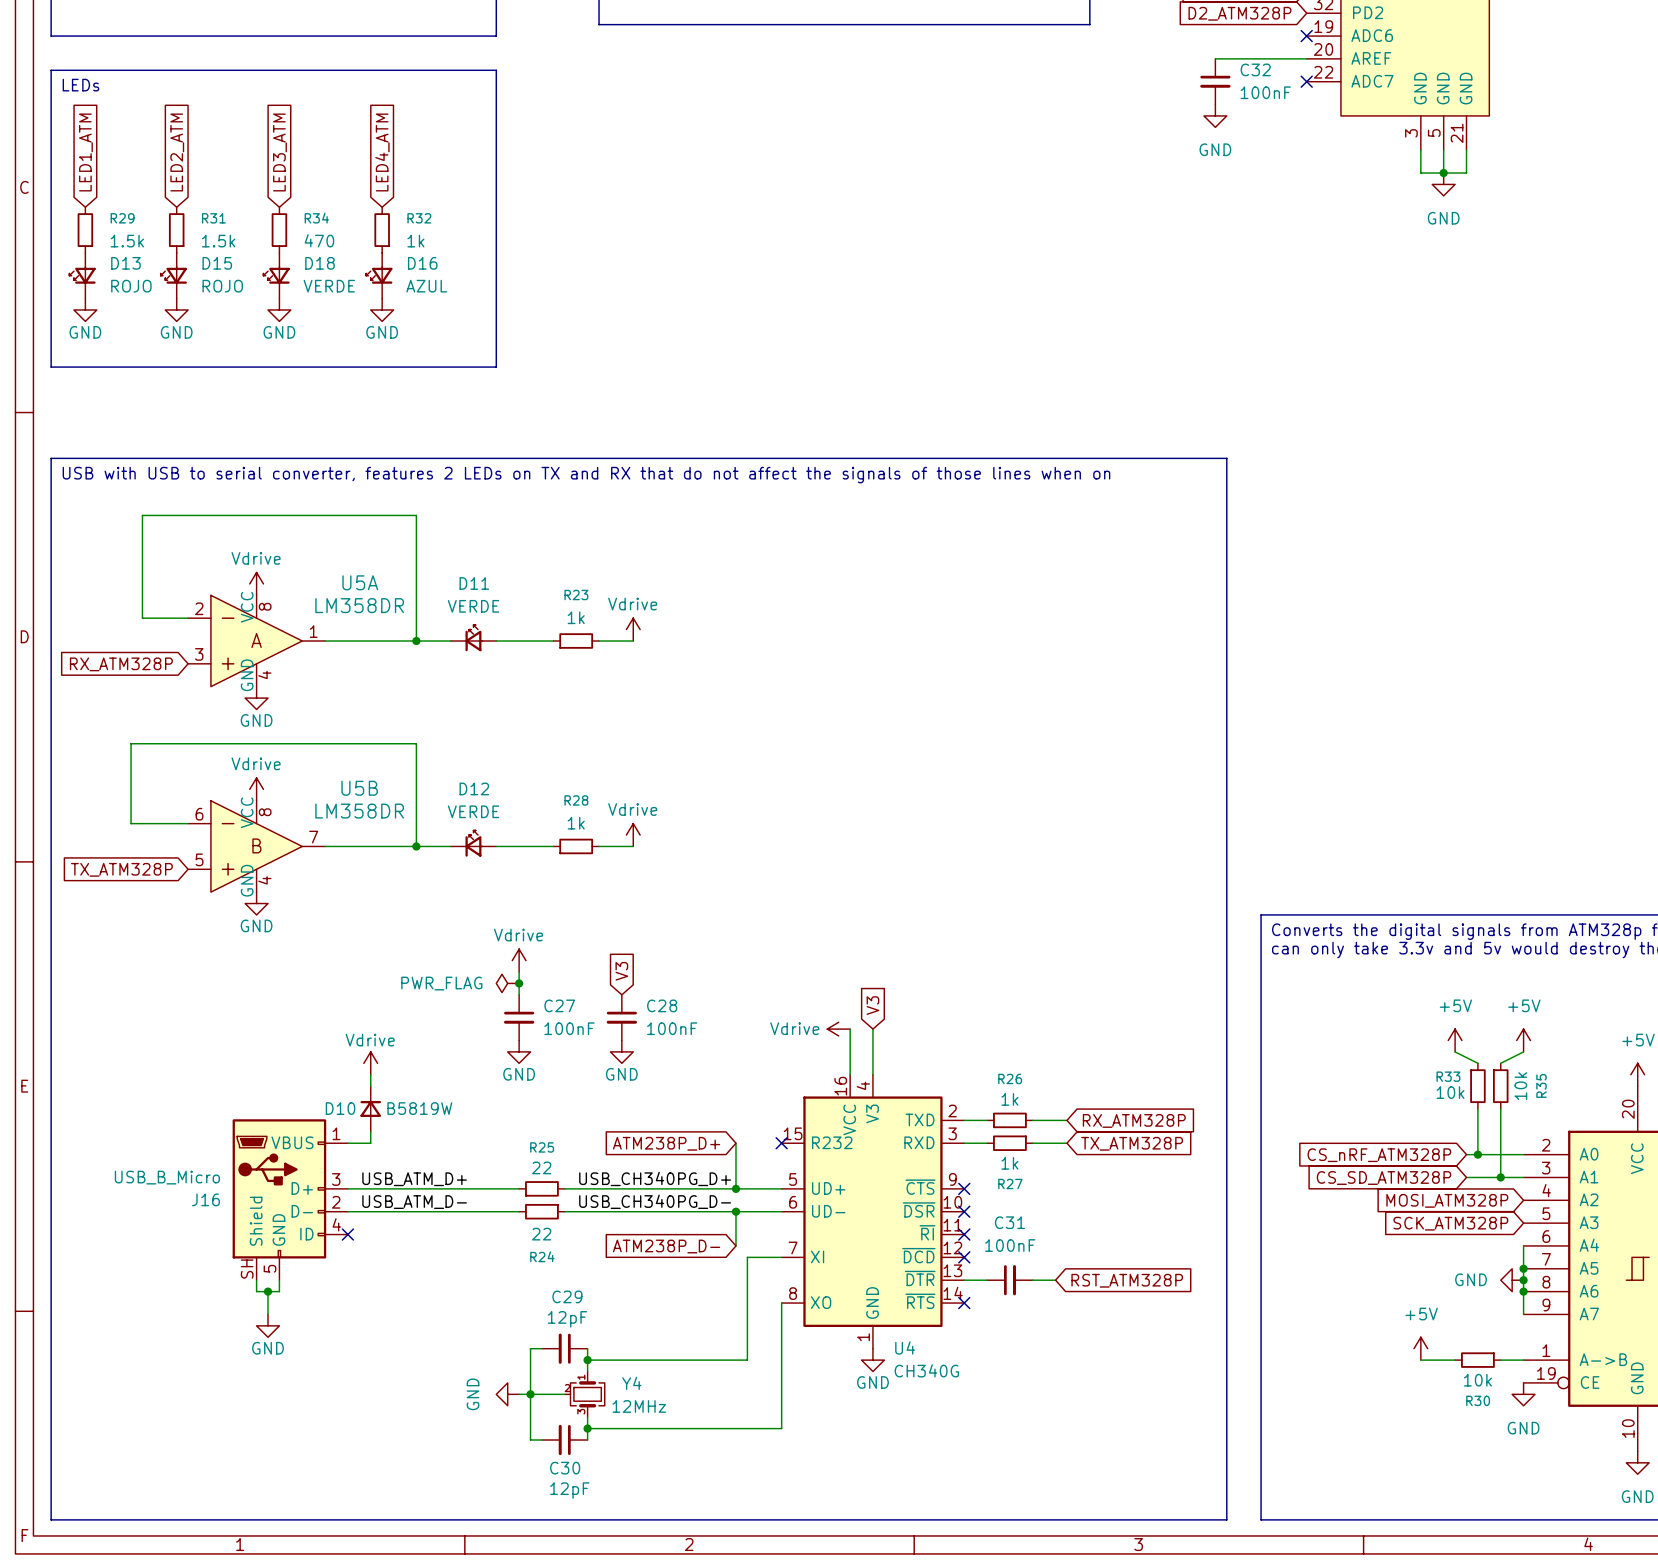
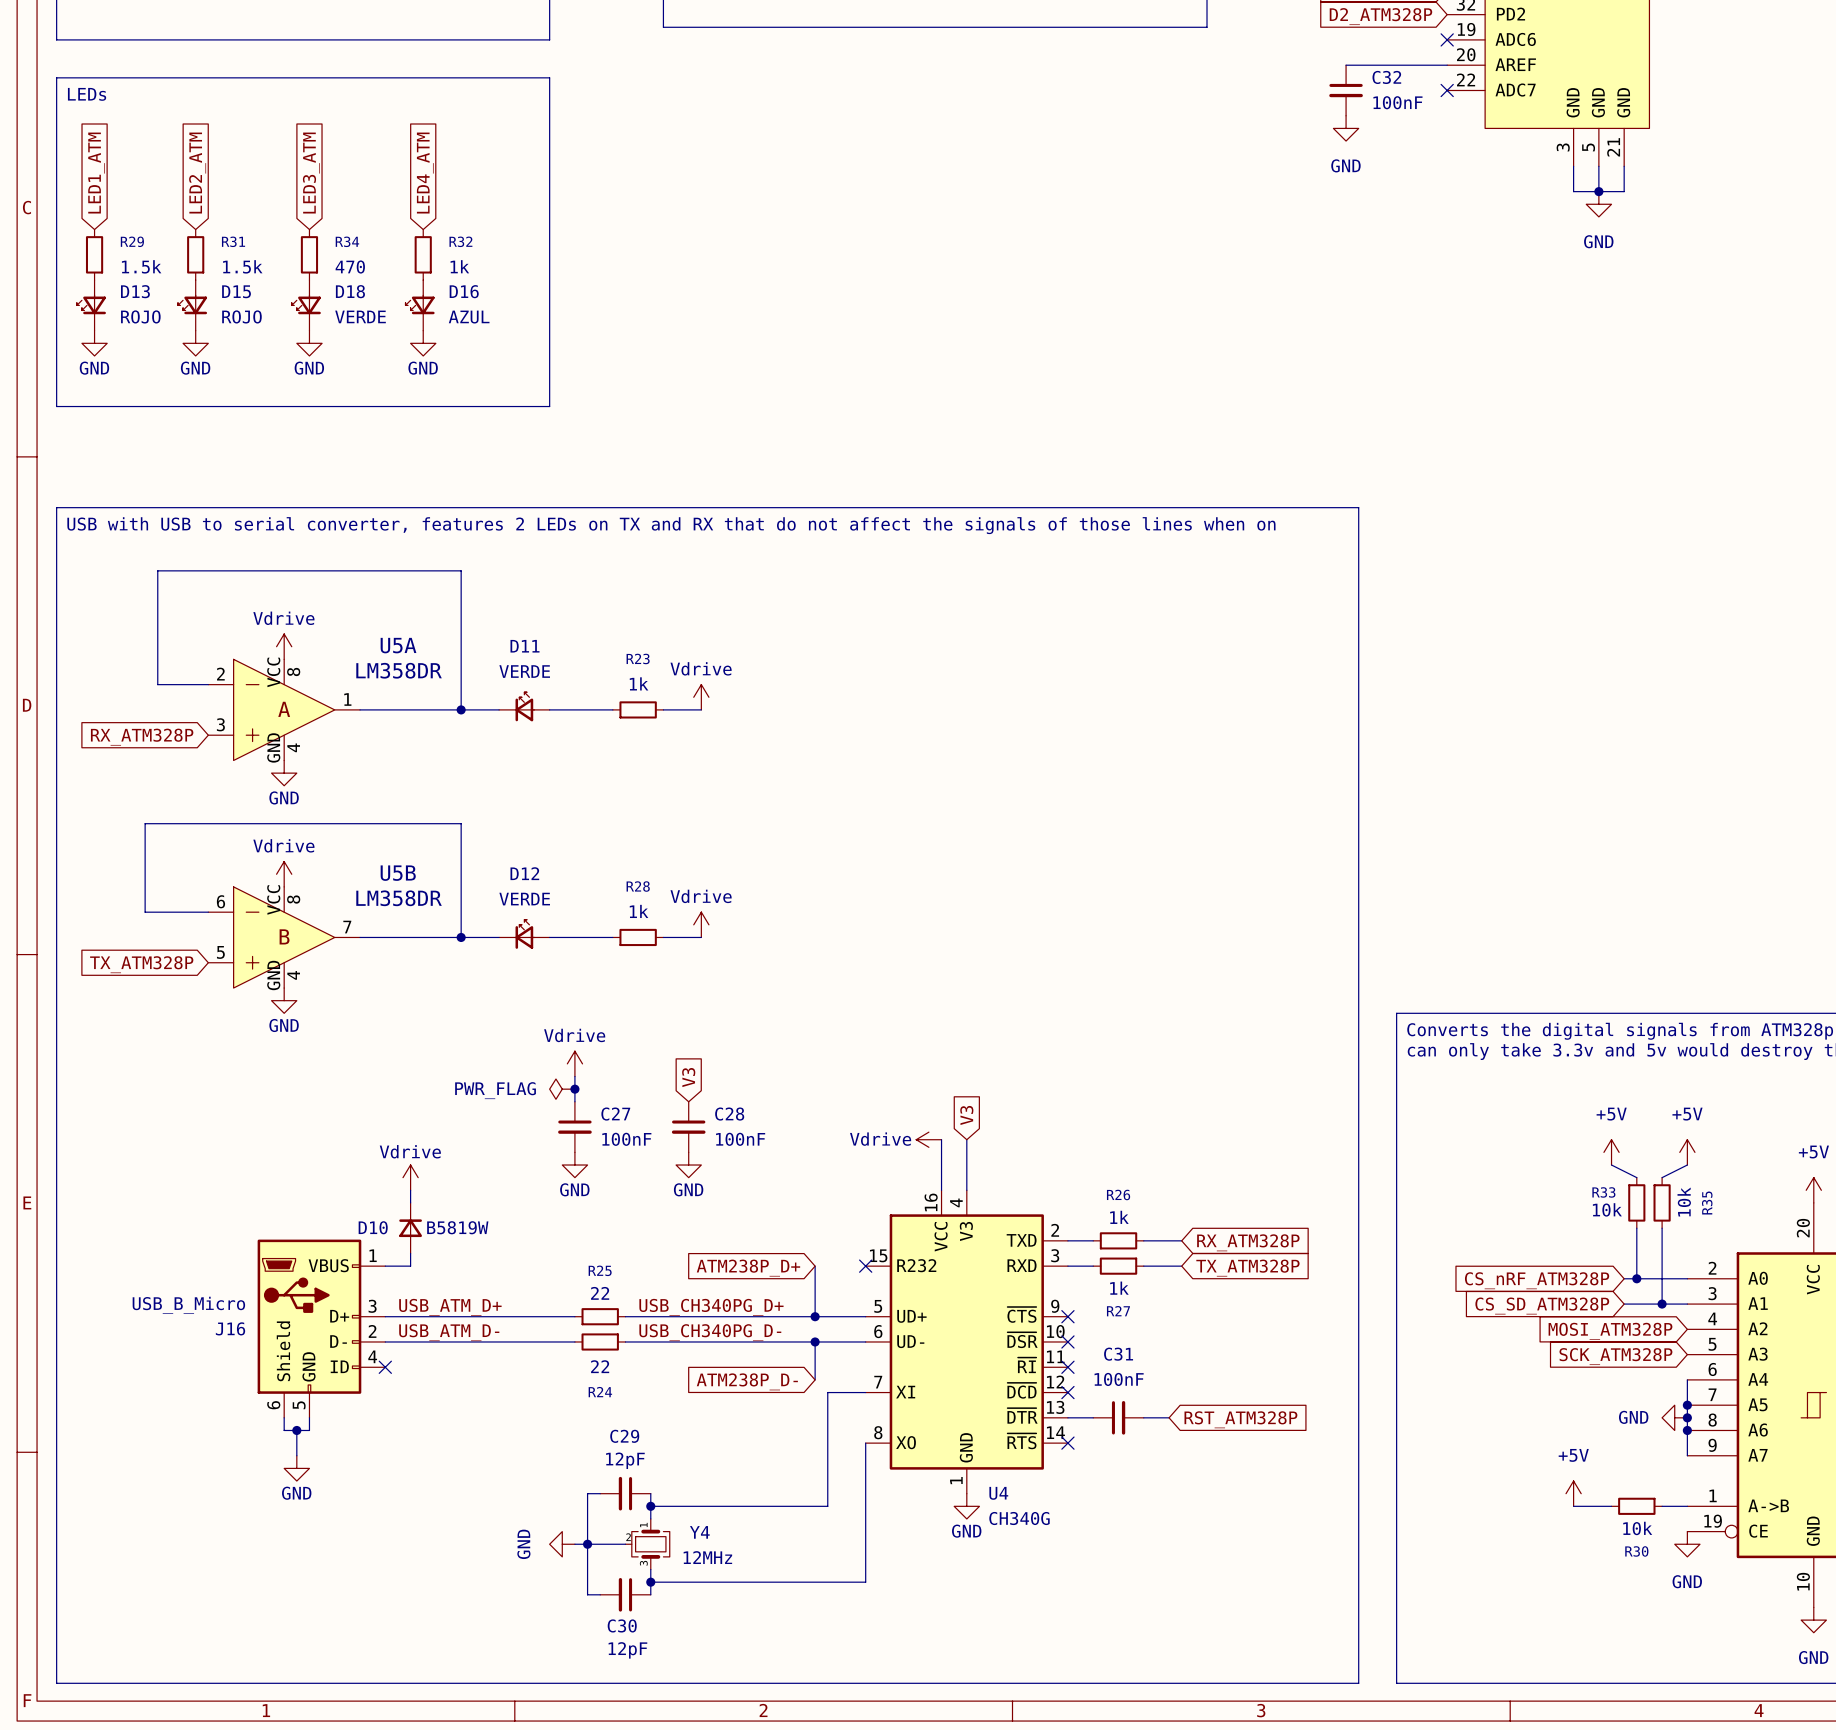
J16 pin number: SH (247, 1269) -> 6 (273, 1405)

